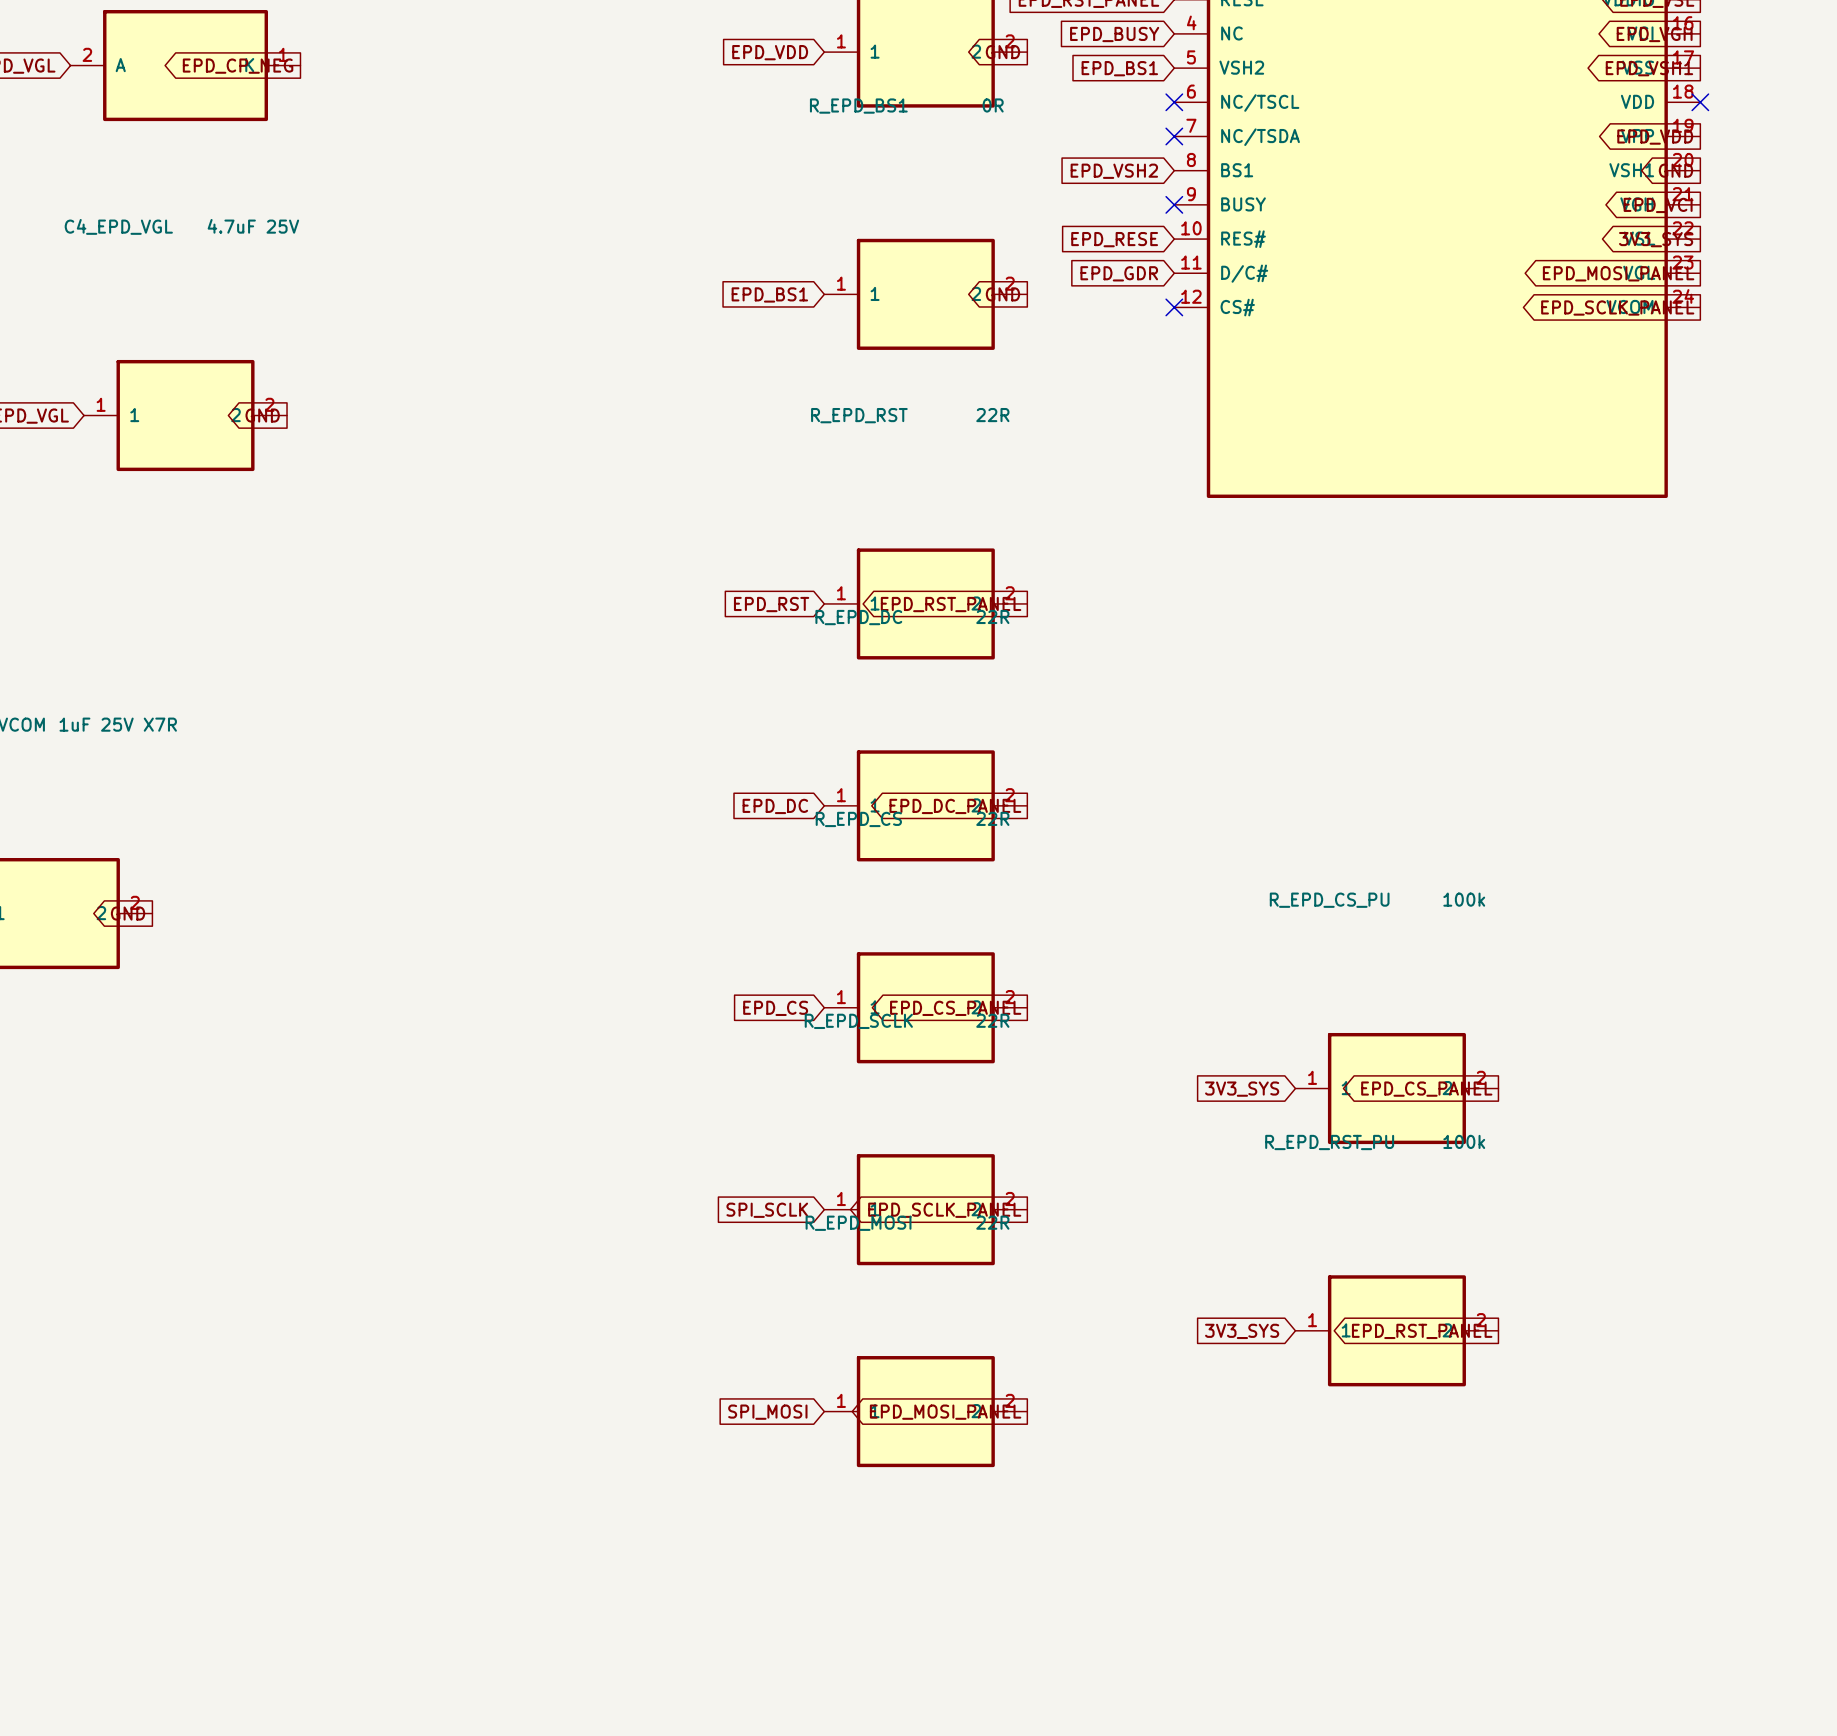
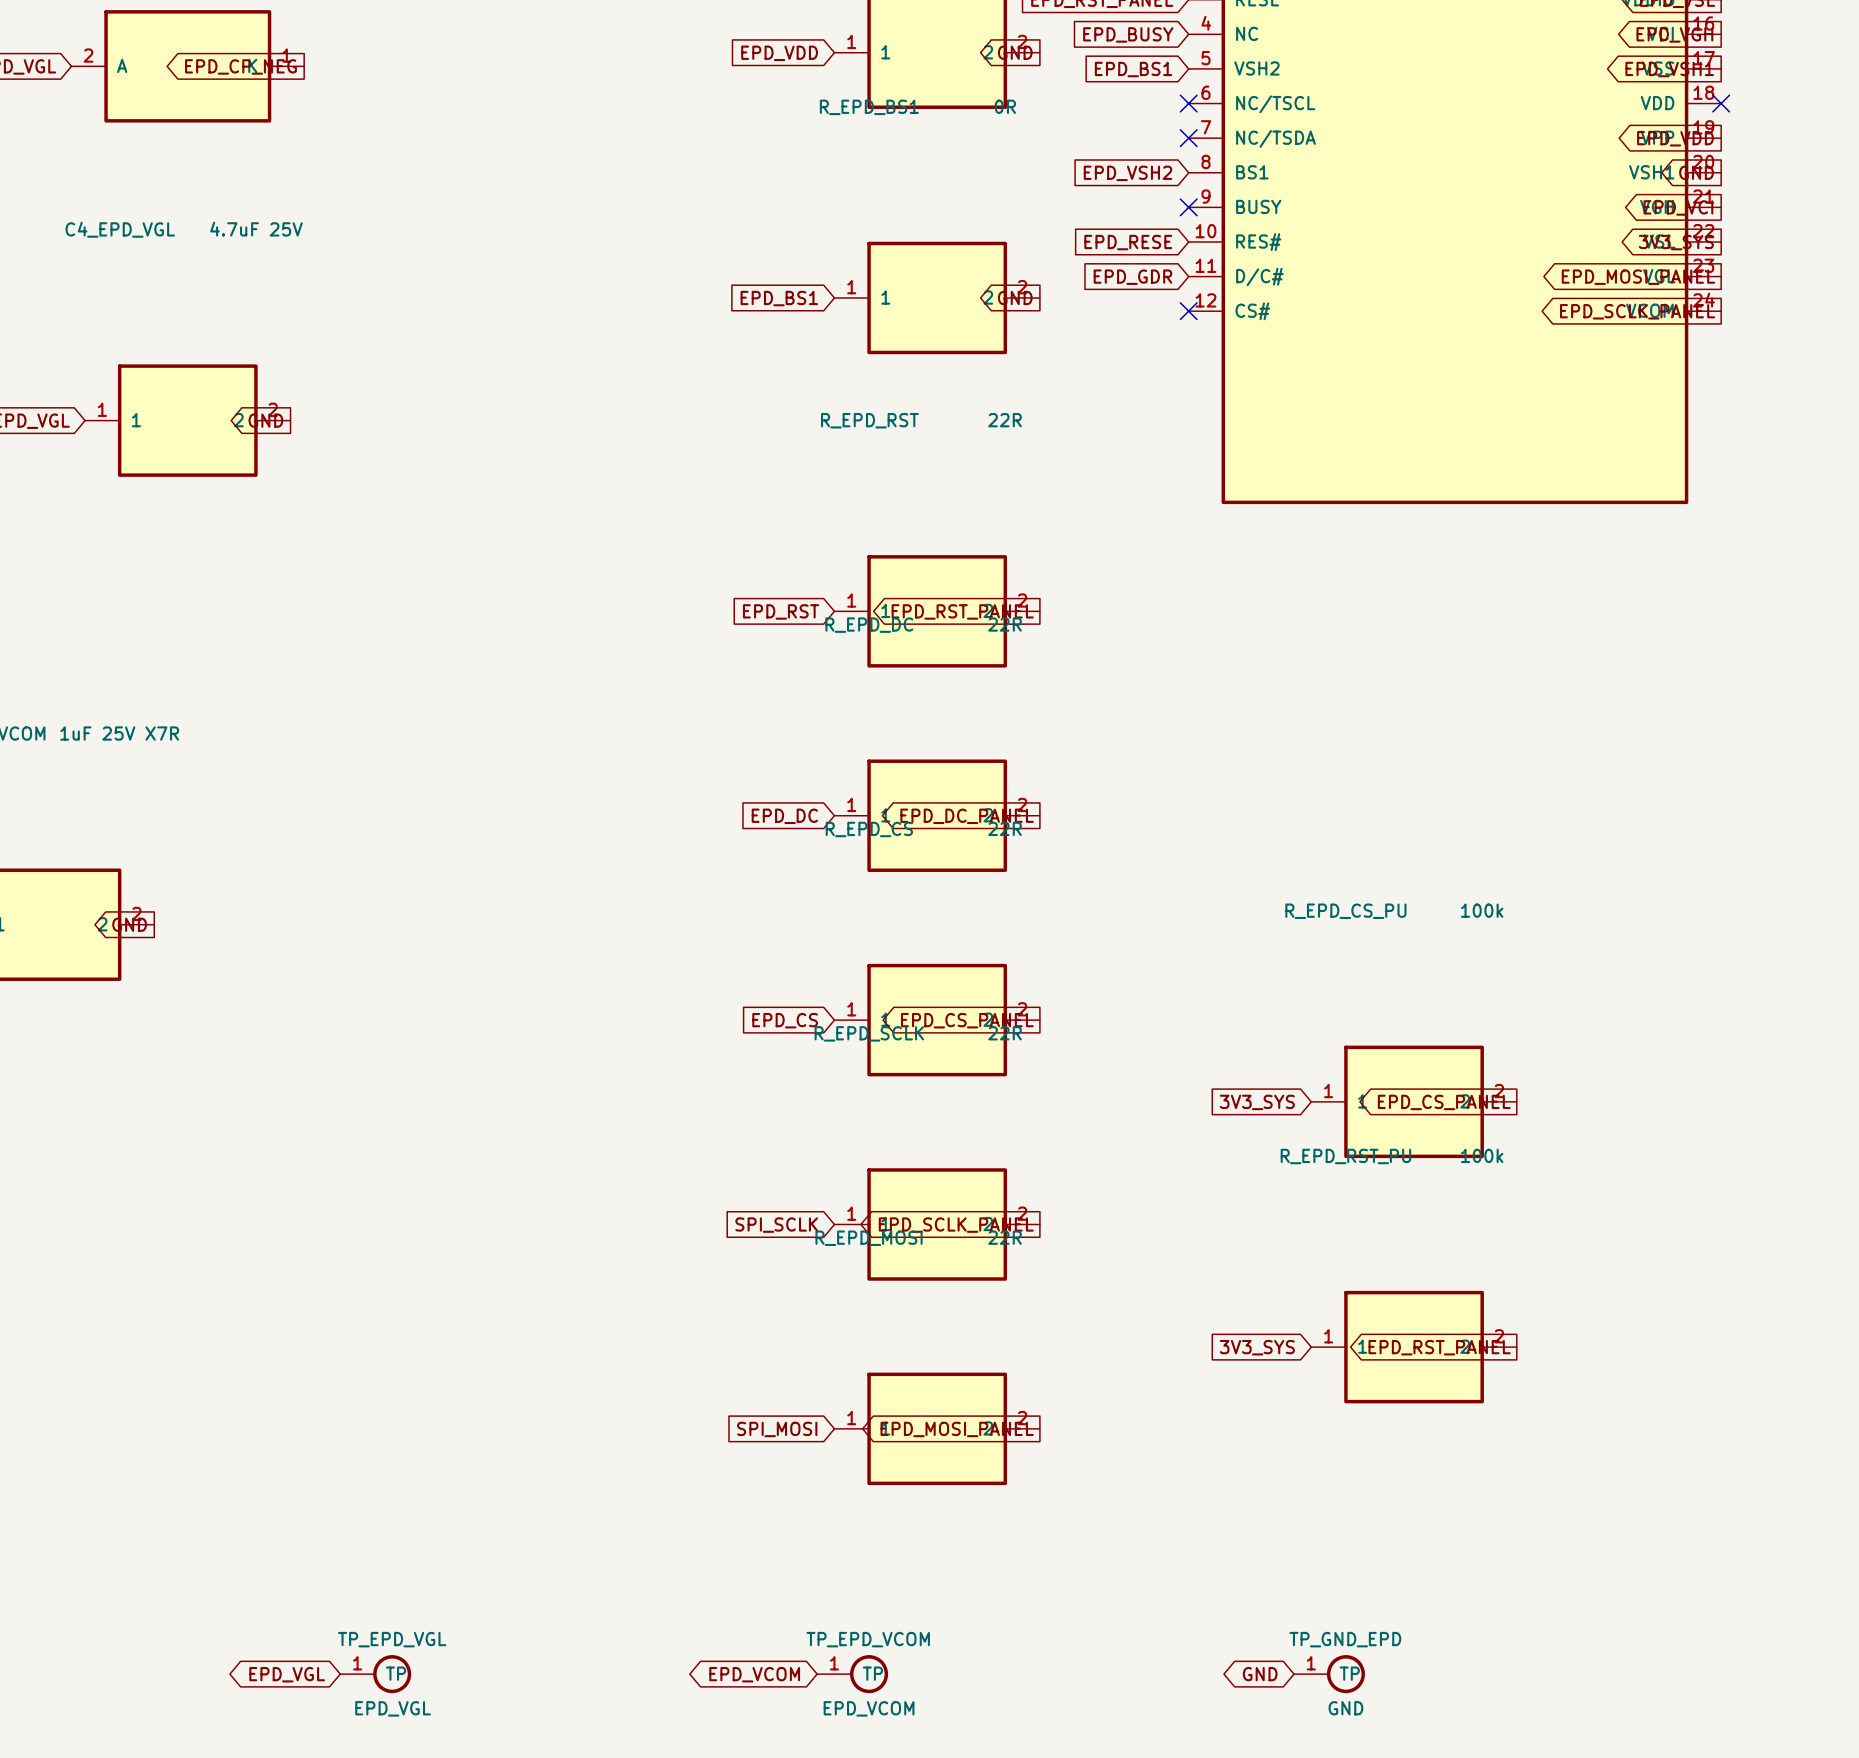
TP_EPD_VGL: none -> EPD_VGL (375, 1674)
TP_EPD_VCOM: none -> EPD_VCOM (852, 1674)
global label: none -> GND (1260, 1674)
TP_GND_EPD: none -> GND (1329, 1674)
global label: none -> EPD_VGL (287, 1674)
global label: none -> EPD_VCOM (754, 1674)

